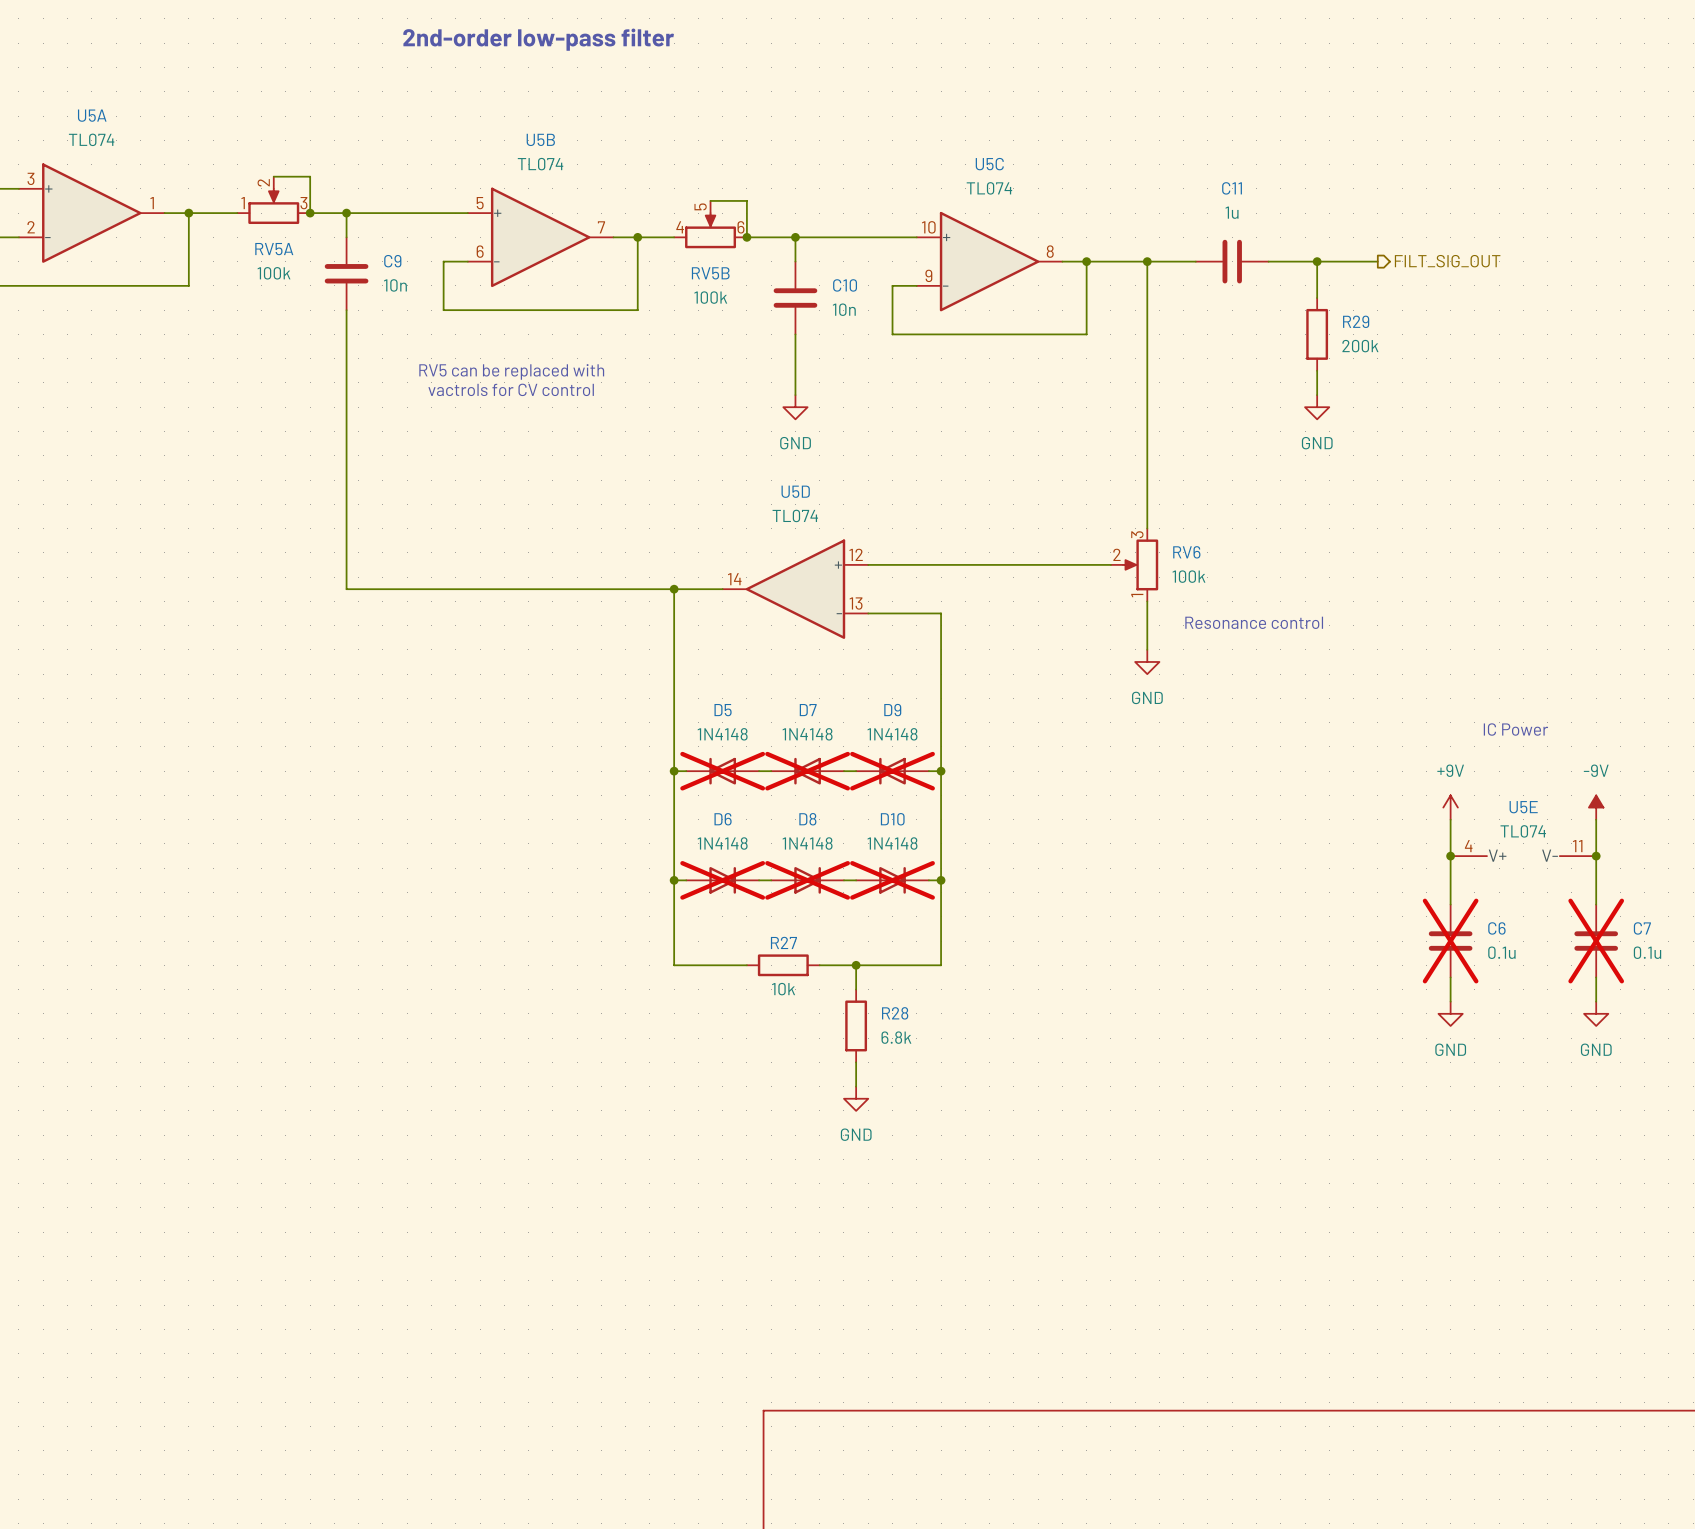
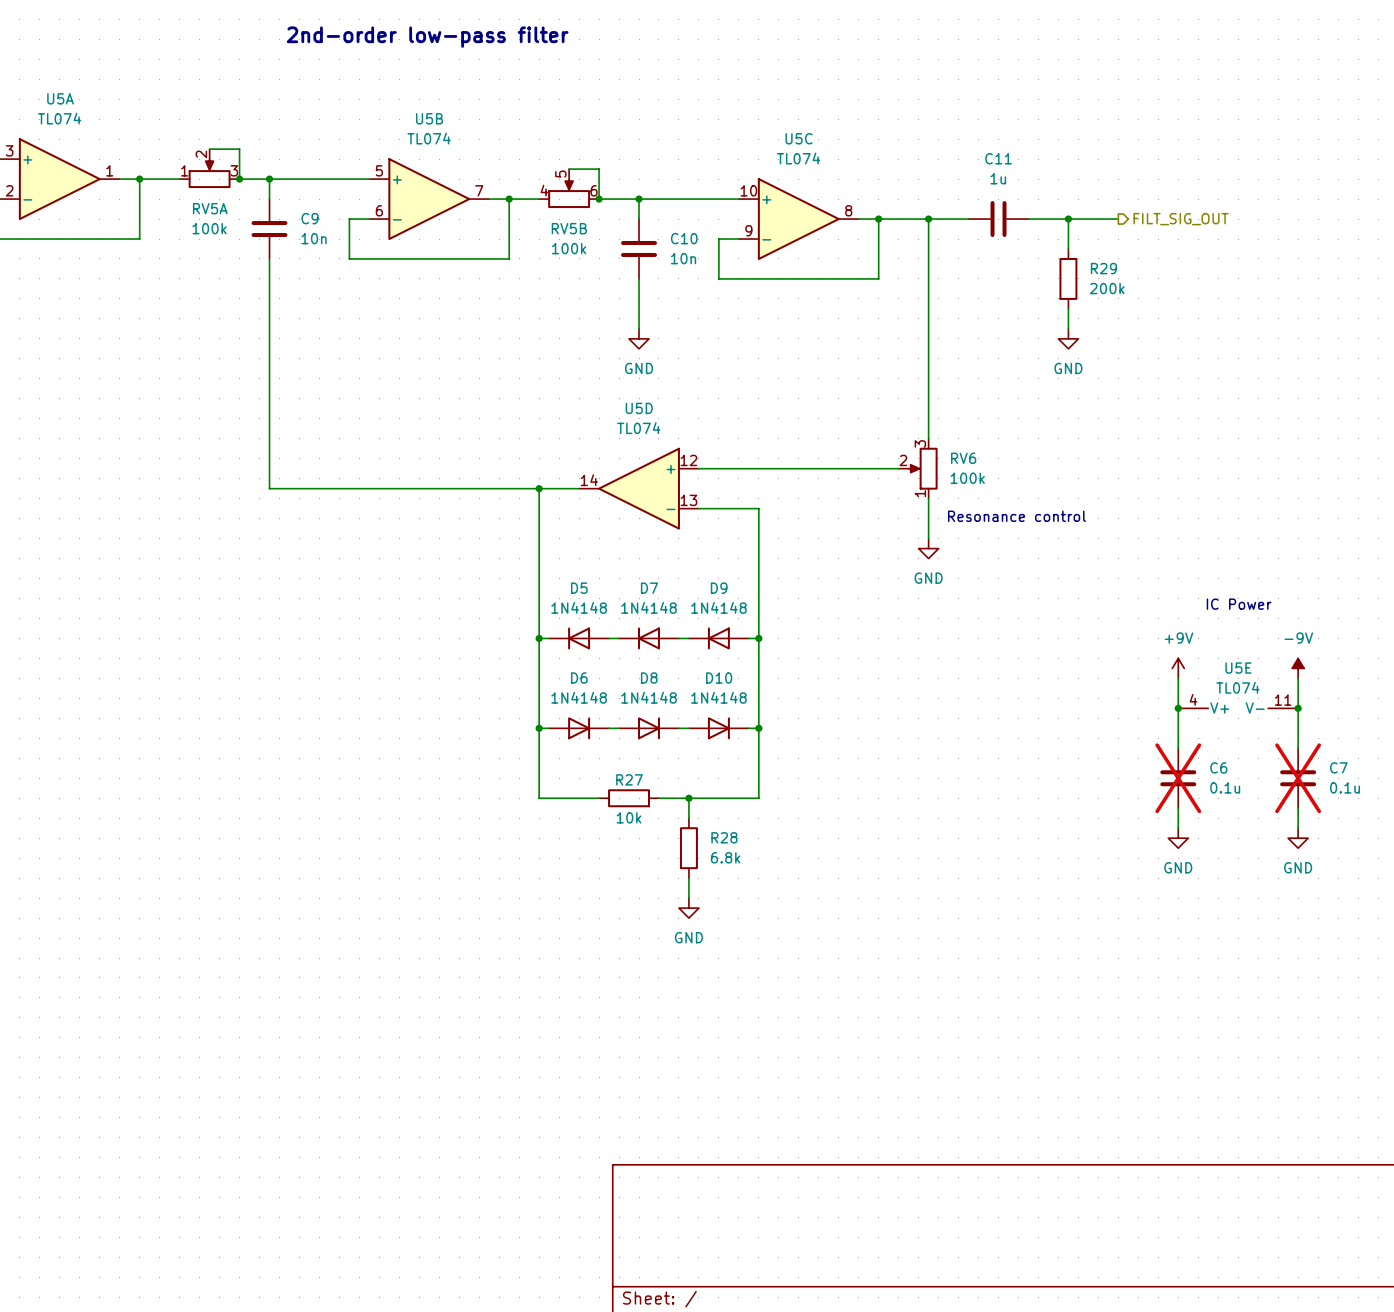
text: RV5 can be replaced with (511, 371) -> none
text: vactrols for CV control (511, 389) -> none
D5 do-not-place cross: (722, 771) -> none
D7 do-not-place cross: (807, 771) -> none
D9 do-not-place cross: (892, 771) -> none
D6 do-not-place cross: (722, 880) -> none
D8 do-not-place cross: (807, 880) -> none
D10 do-not-place cross: (892, 880) -> none

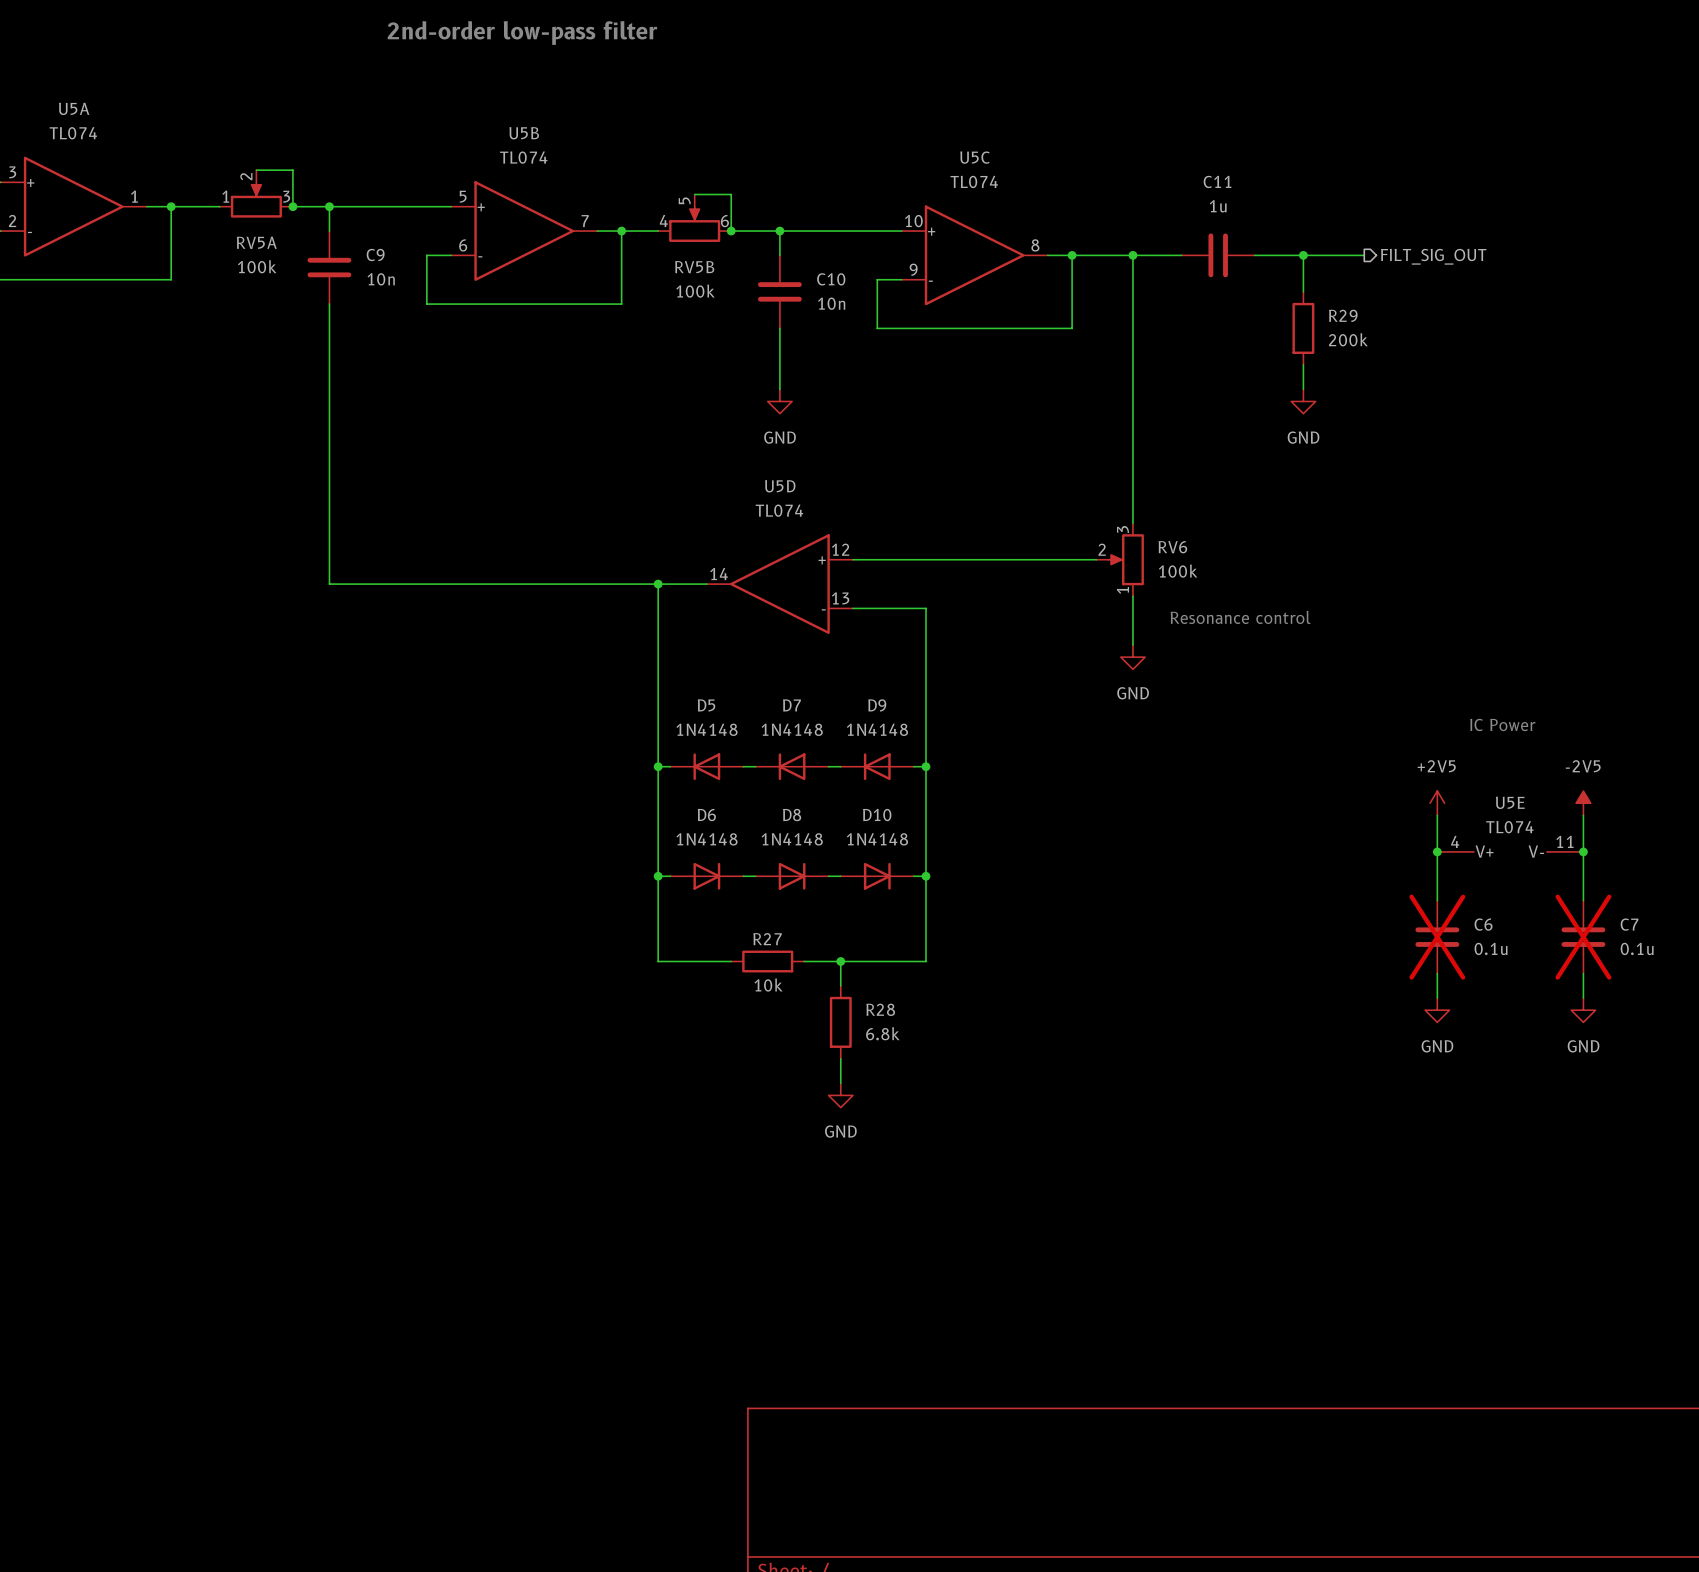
power symbol: +9V (1178, 668) -> +2V5 (1437, 803)
power symbol: -9V (1298, 668) -> -2V5 (1583, 803)

